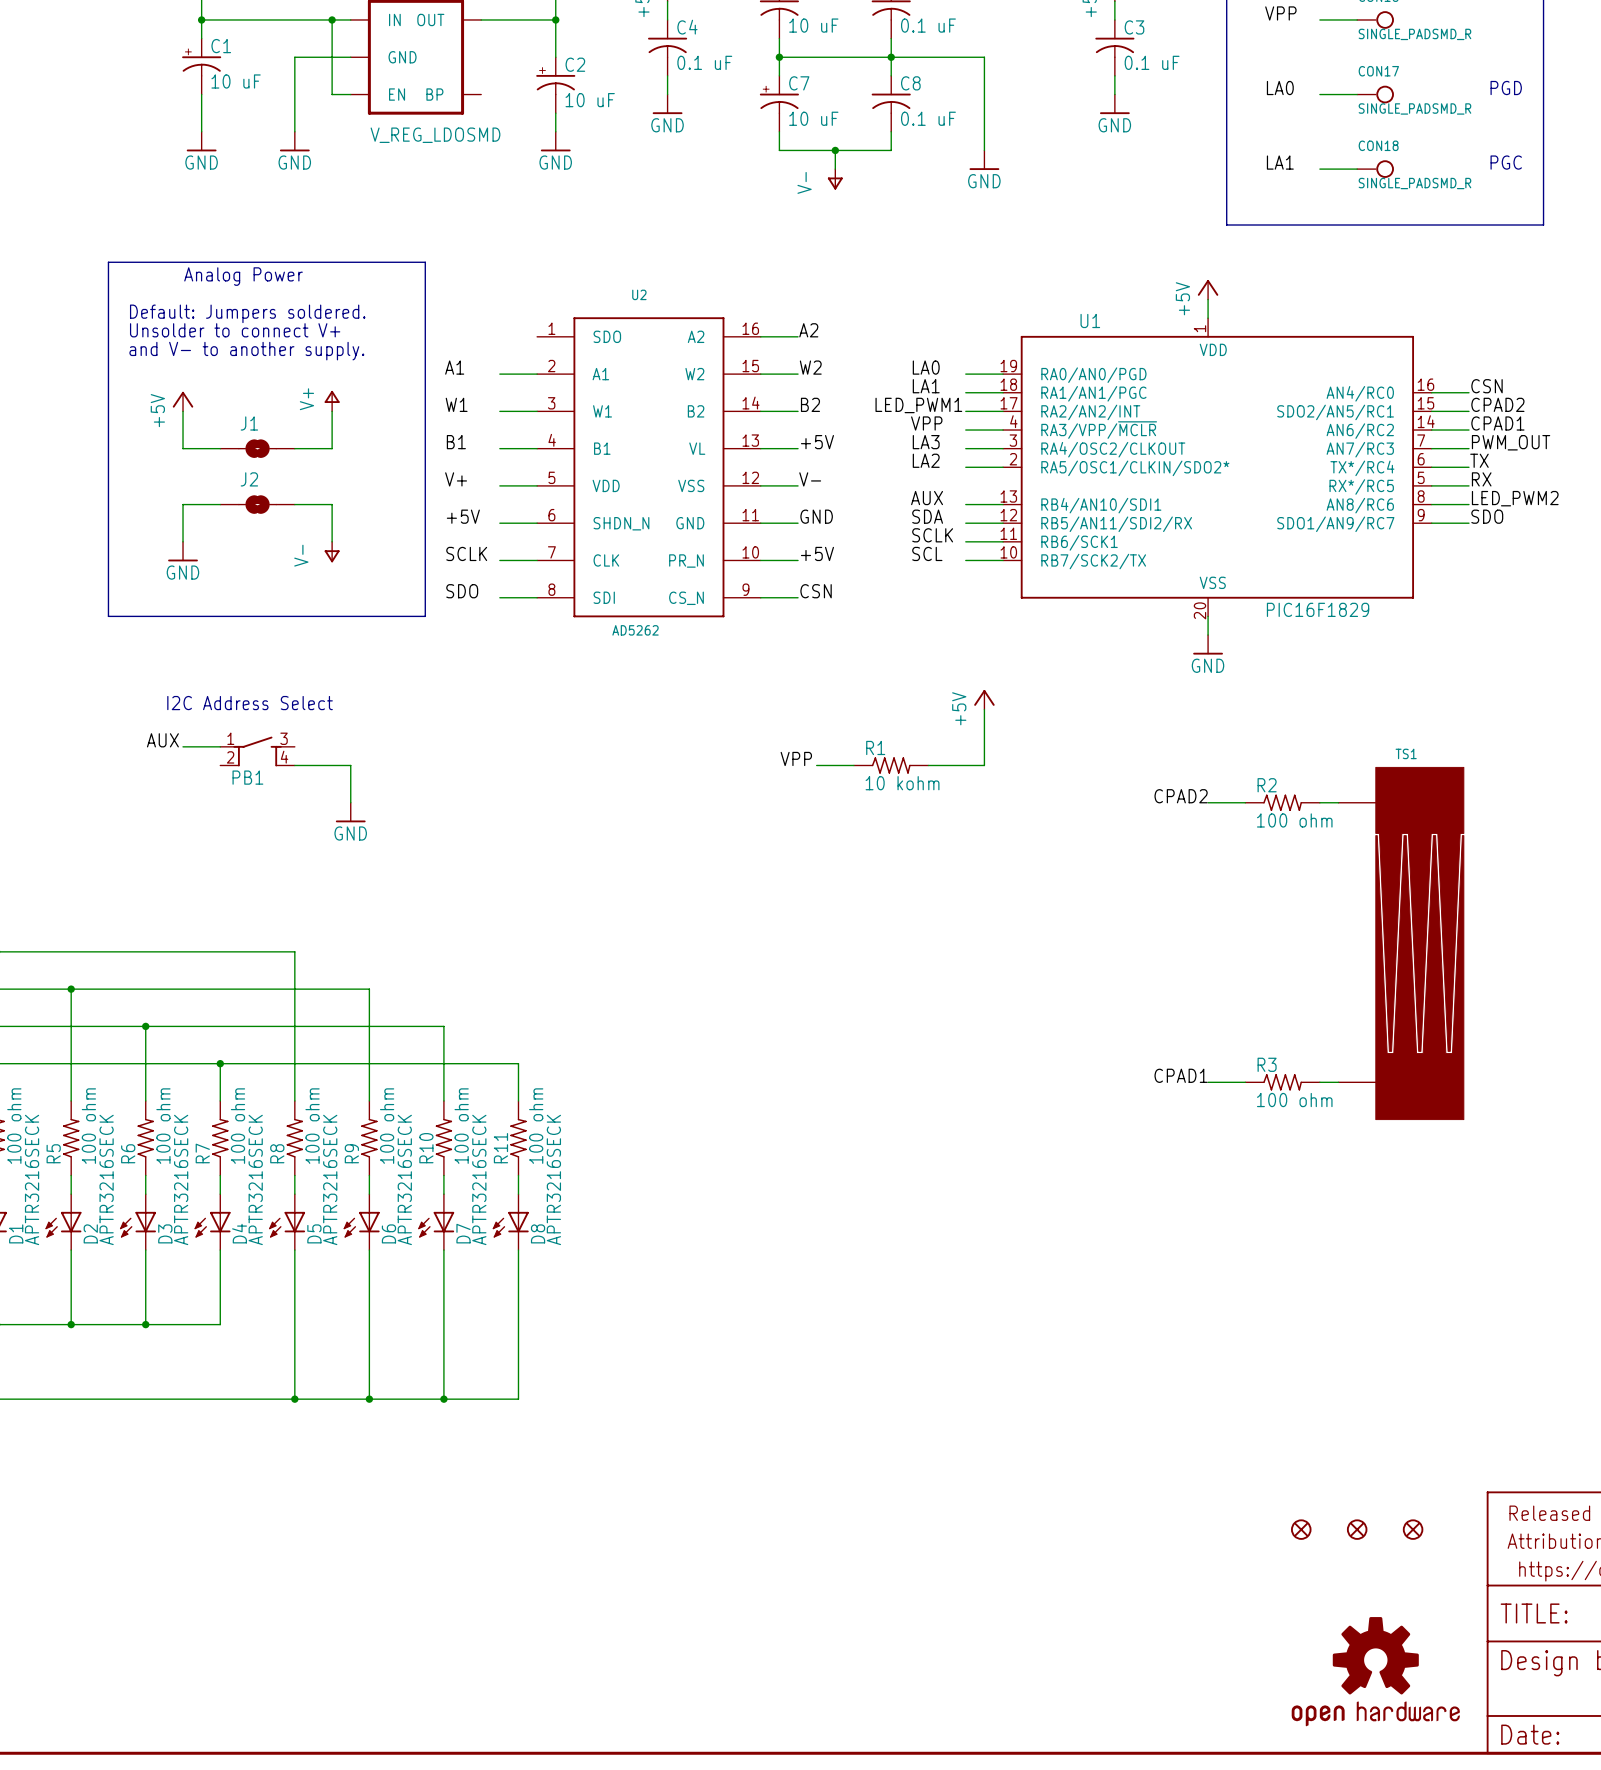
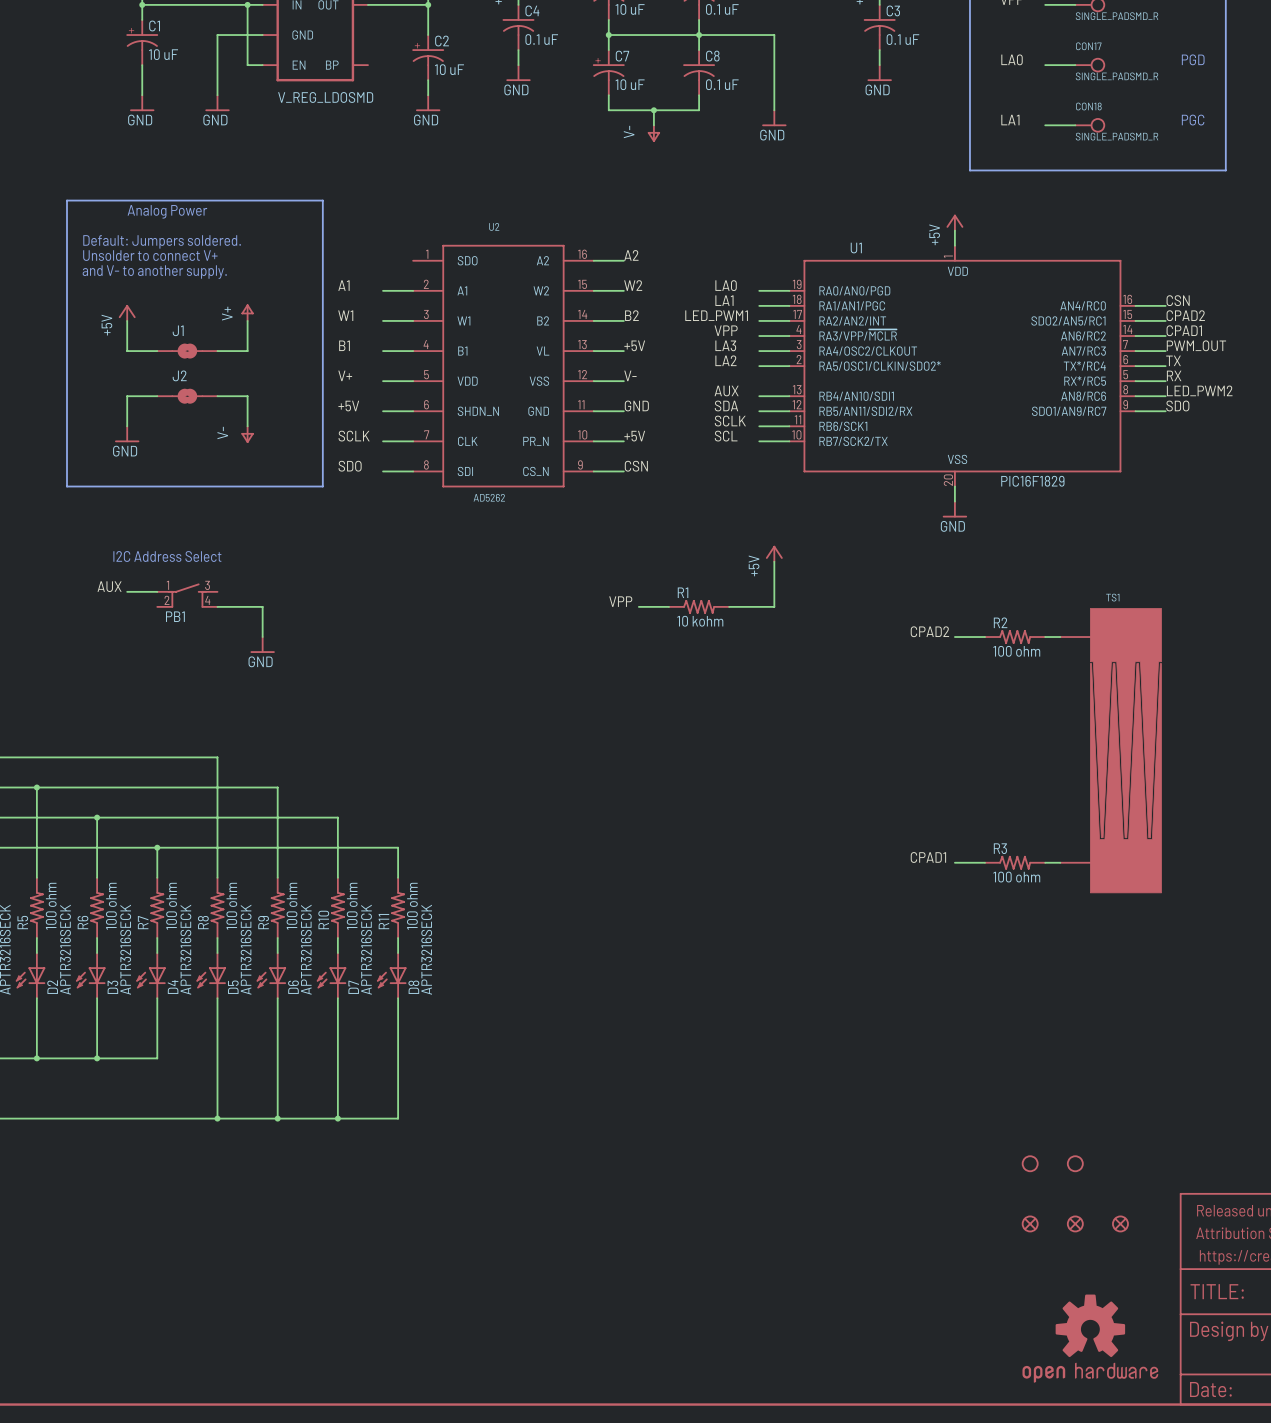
part: none -> (1030, 1163)
part: none -> (1075, 1163)

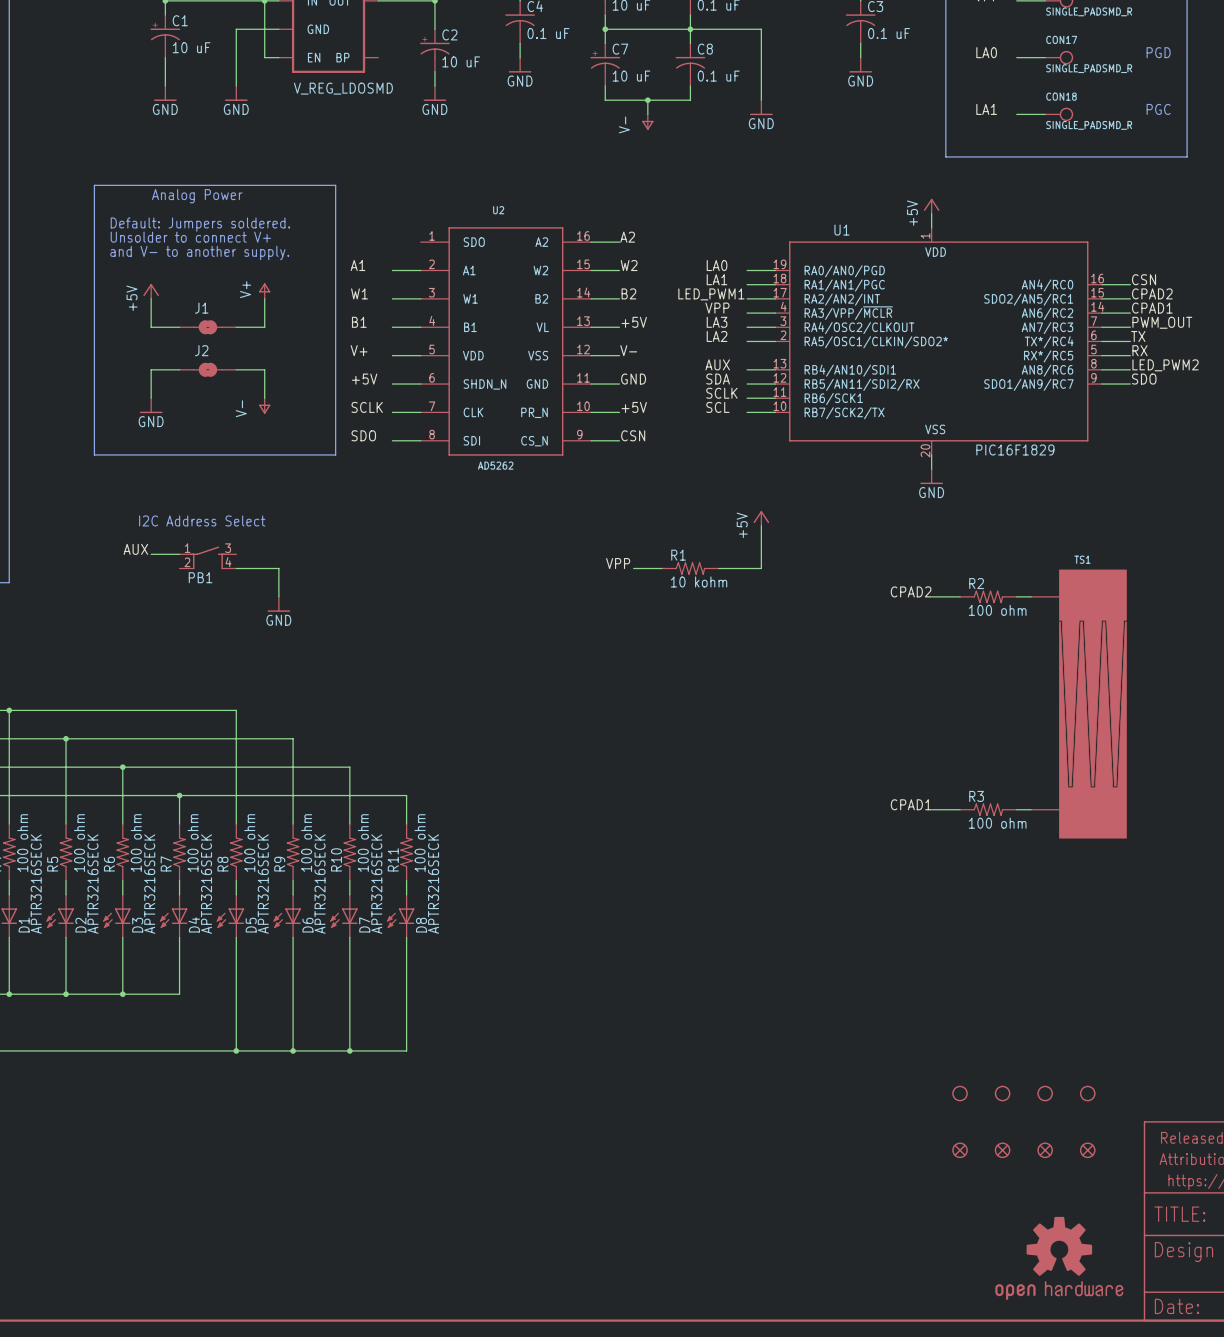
part: none -> (960, 1093)
part: none -> (1087, 1093)
part: none -> (960, 1150)

